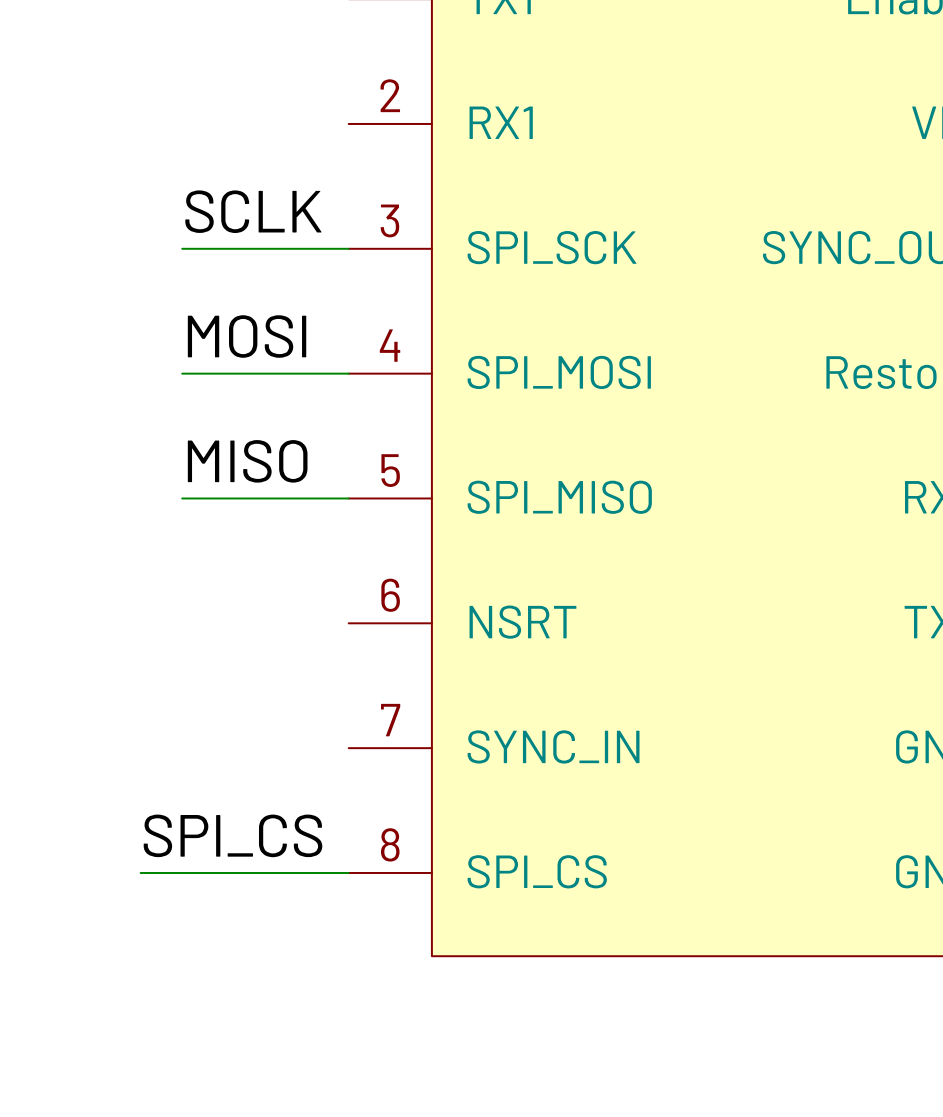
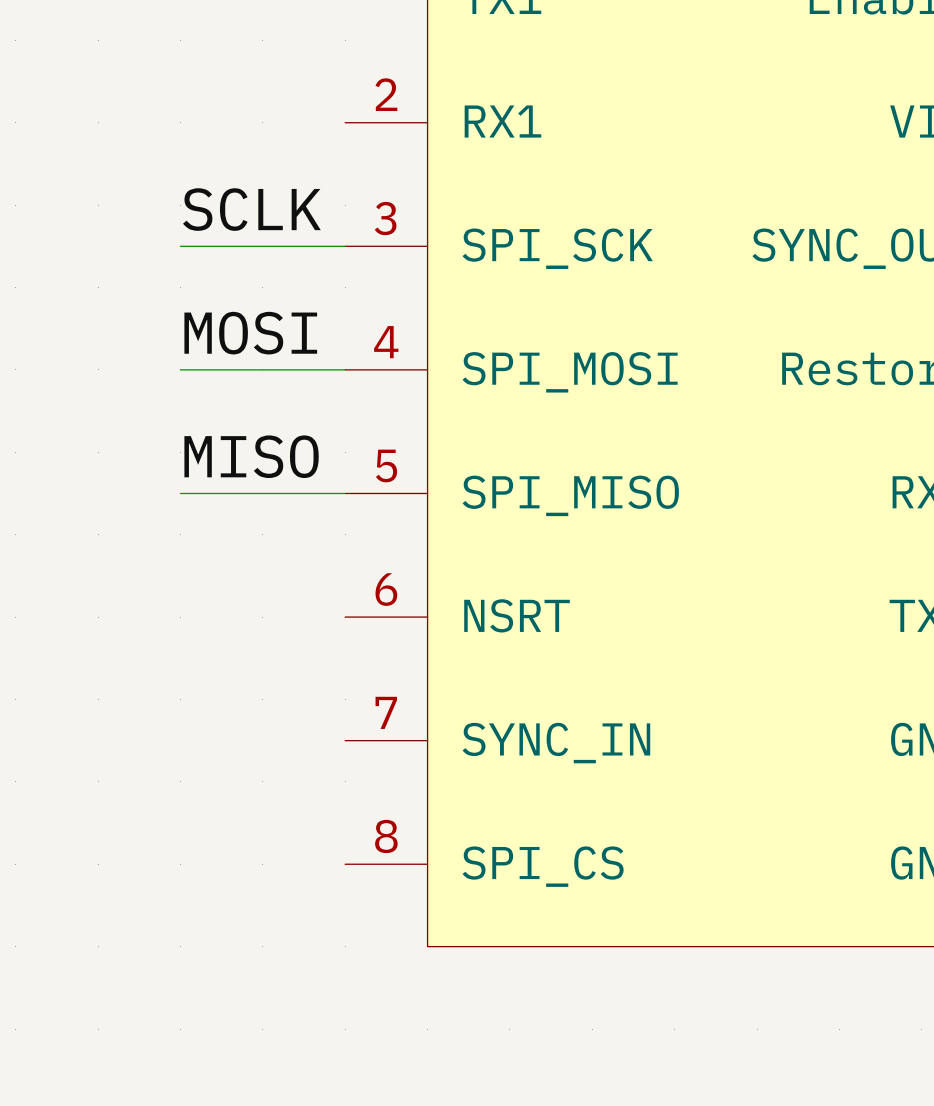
label: SPI_CS (233, 835) -> none
wire: (140, 872) (348, 872) -> none

